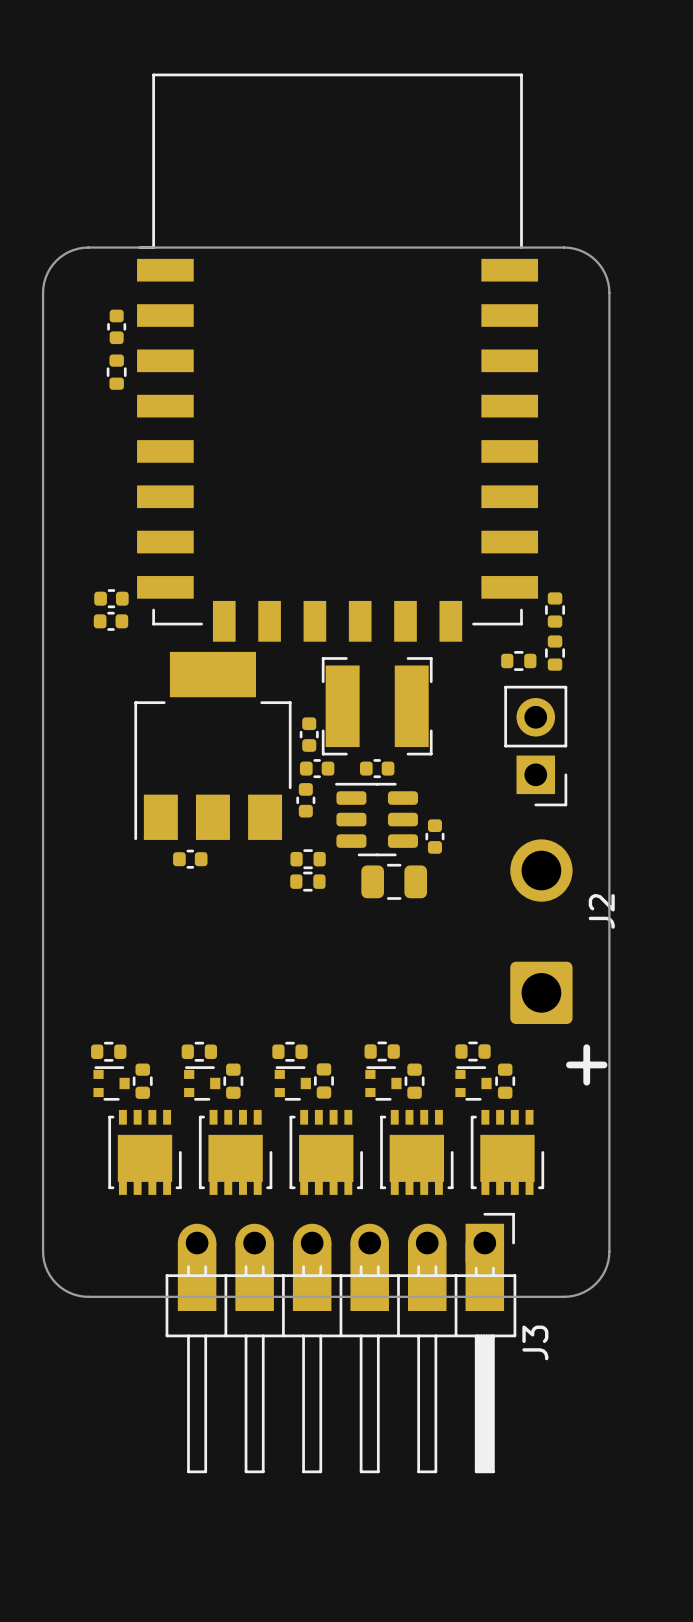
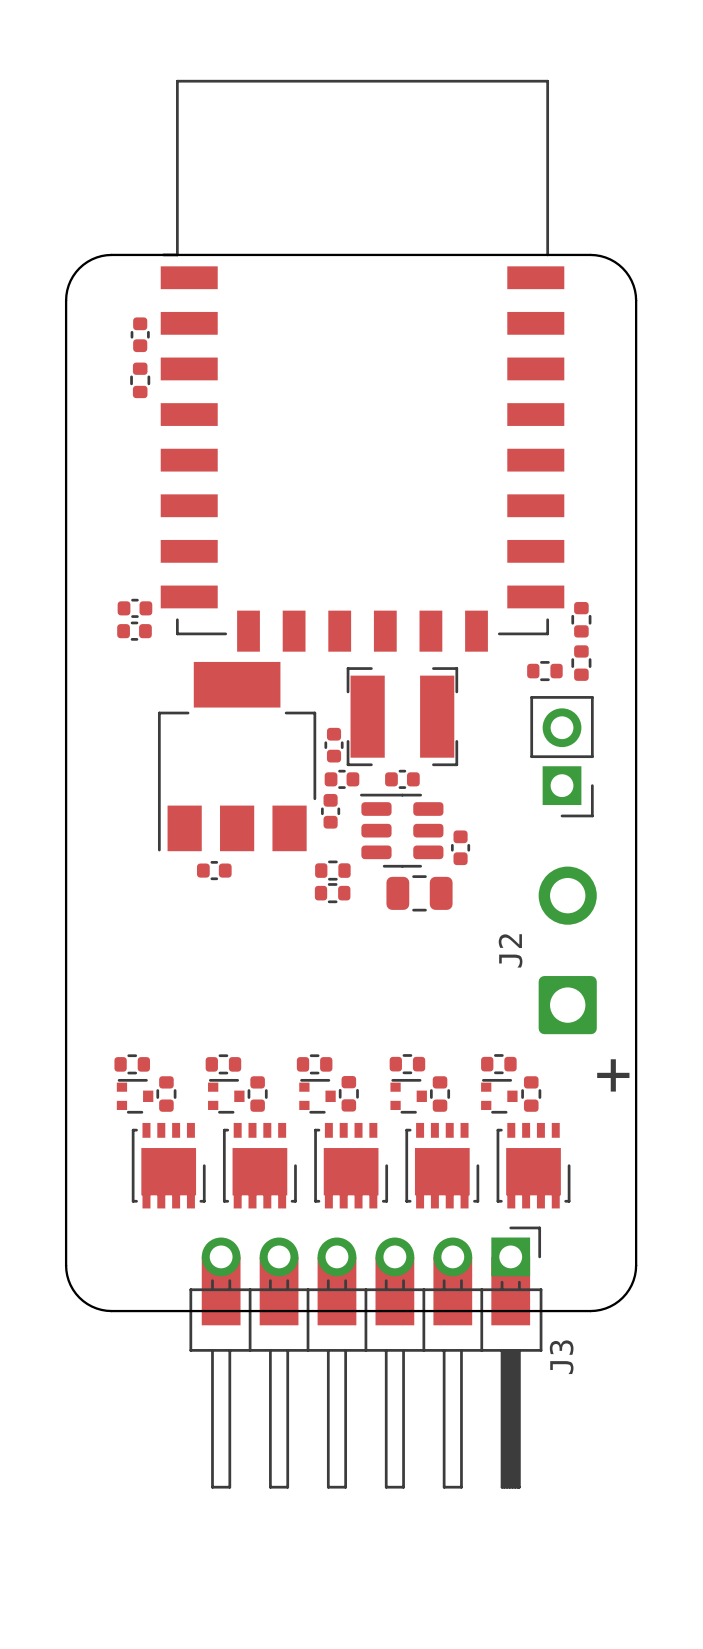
J2 footprint: [510, 839, 573, 1025] -> [538, 866, 597, 1035]
J2 name position: J2 (601, 911) -> J2 (510, 950)

